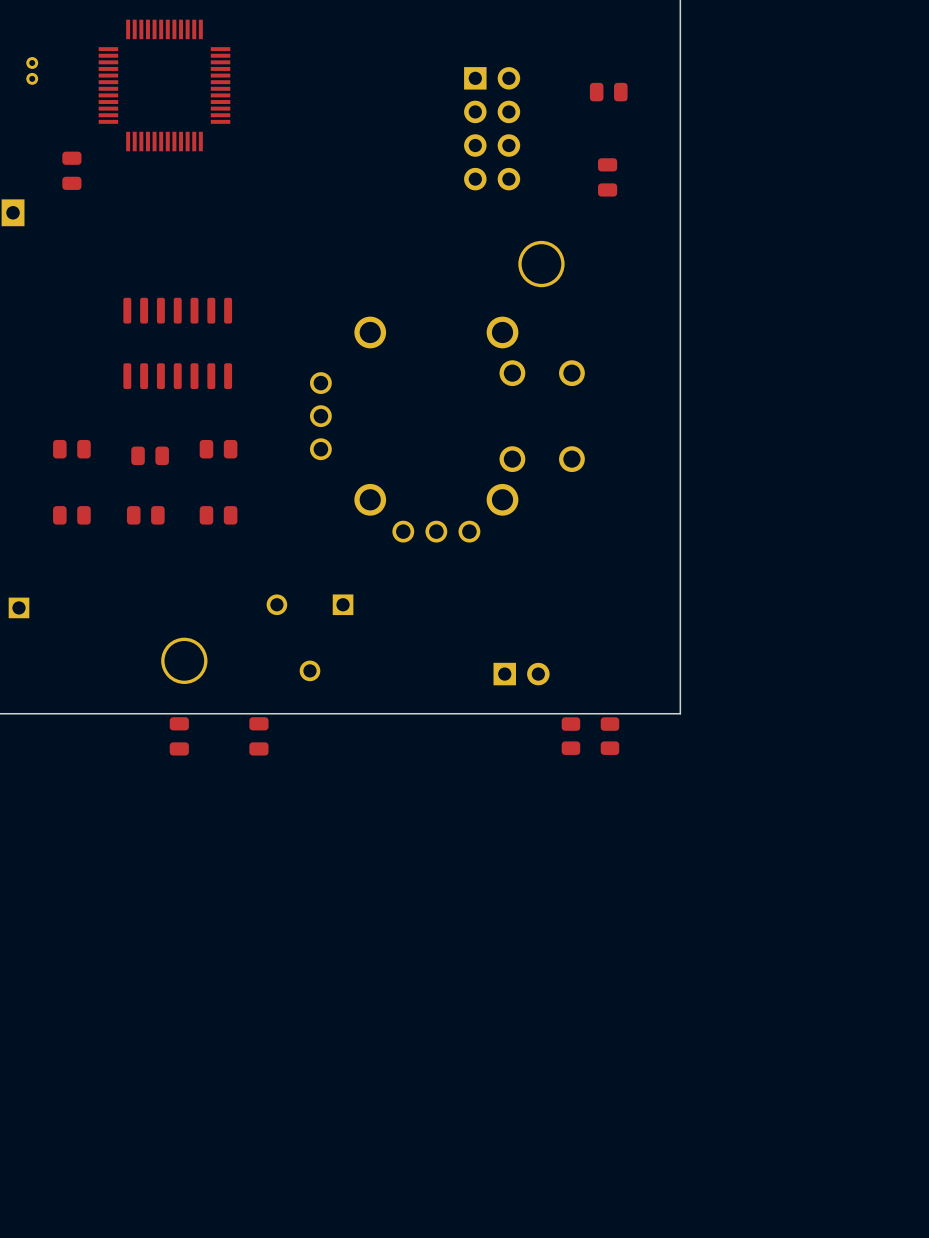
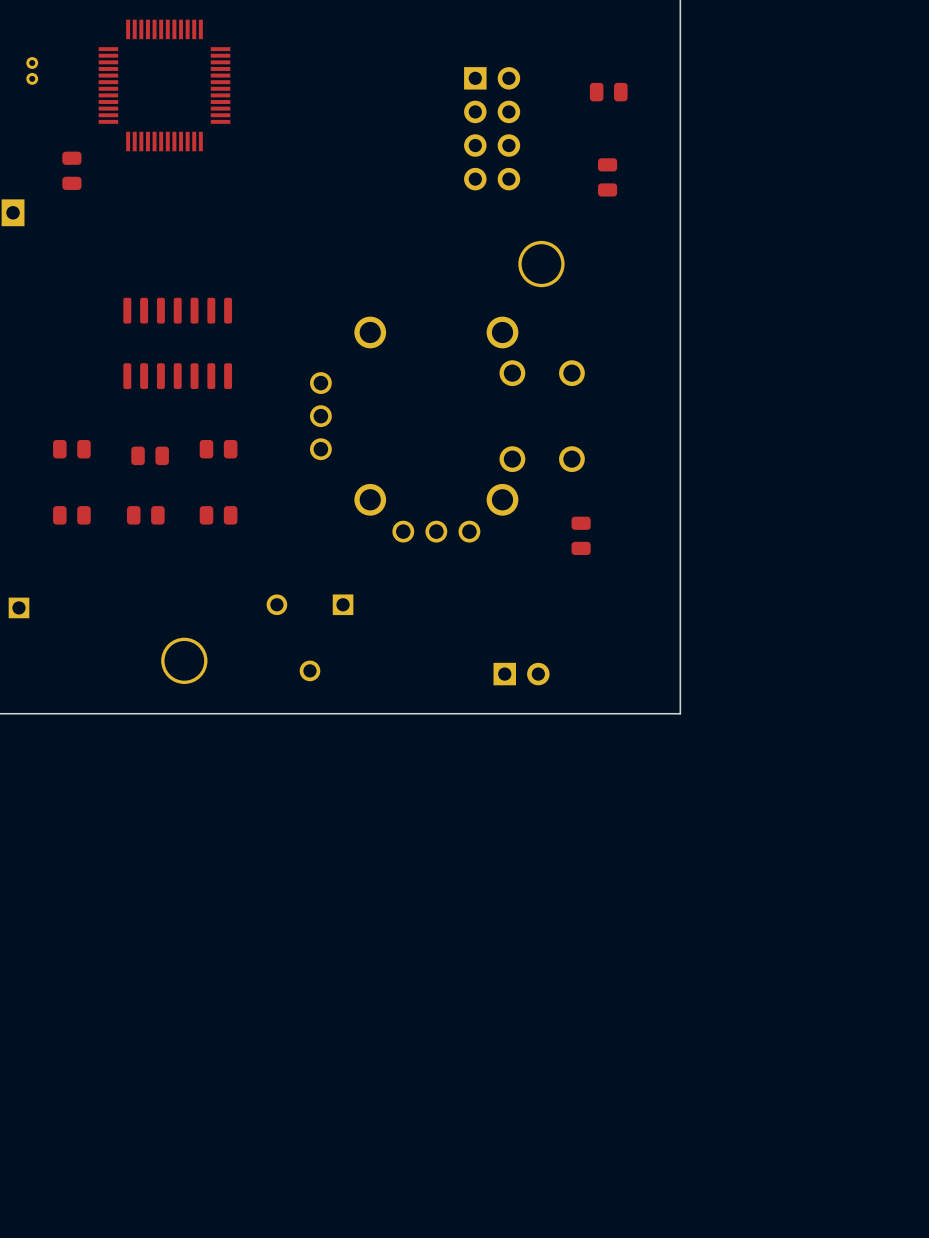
part: none -> (581, 535)
part: (179, 736) -> none
part: (258, 736) -> none
part: (570, 736) -> none
part: (609, 736) -> none

